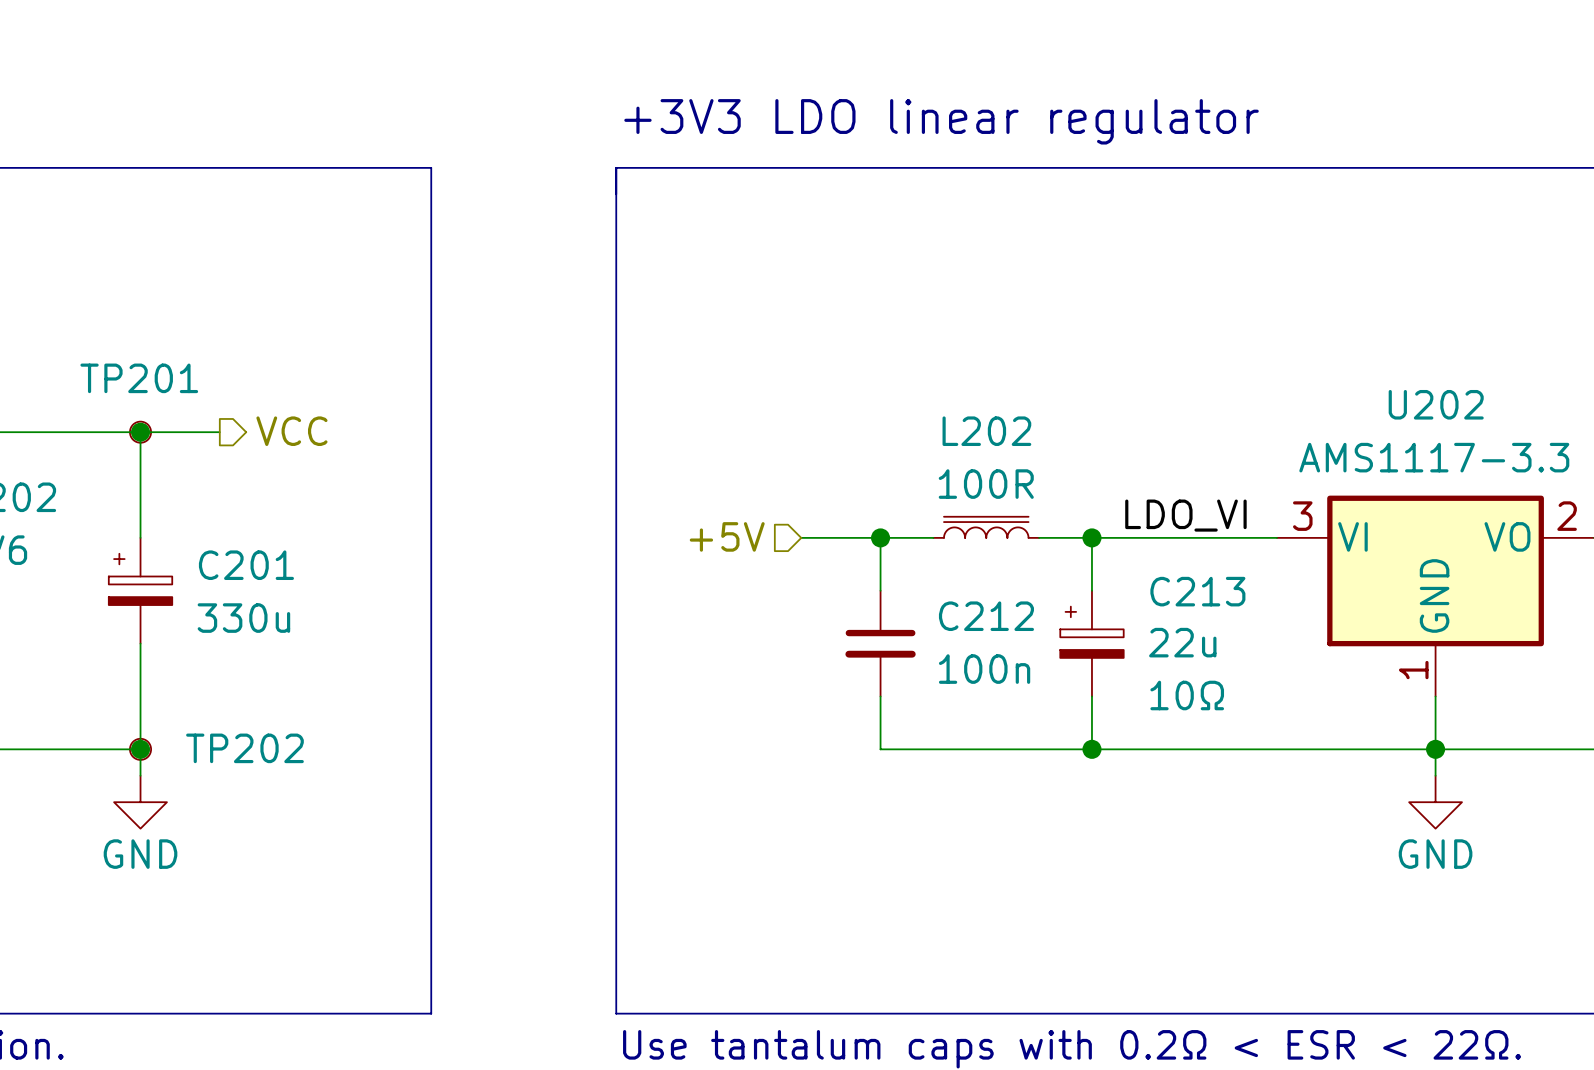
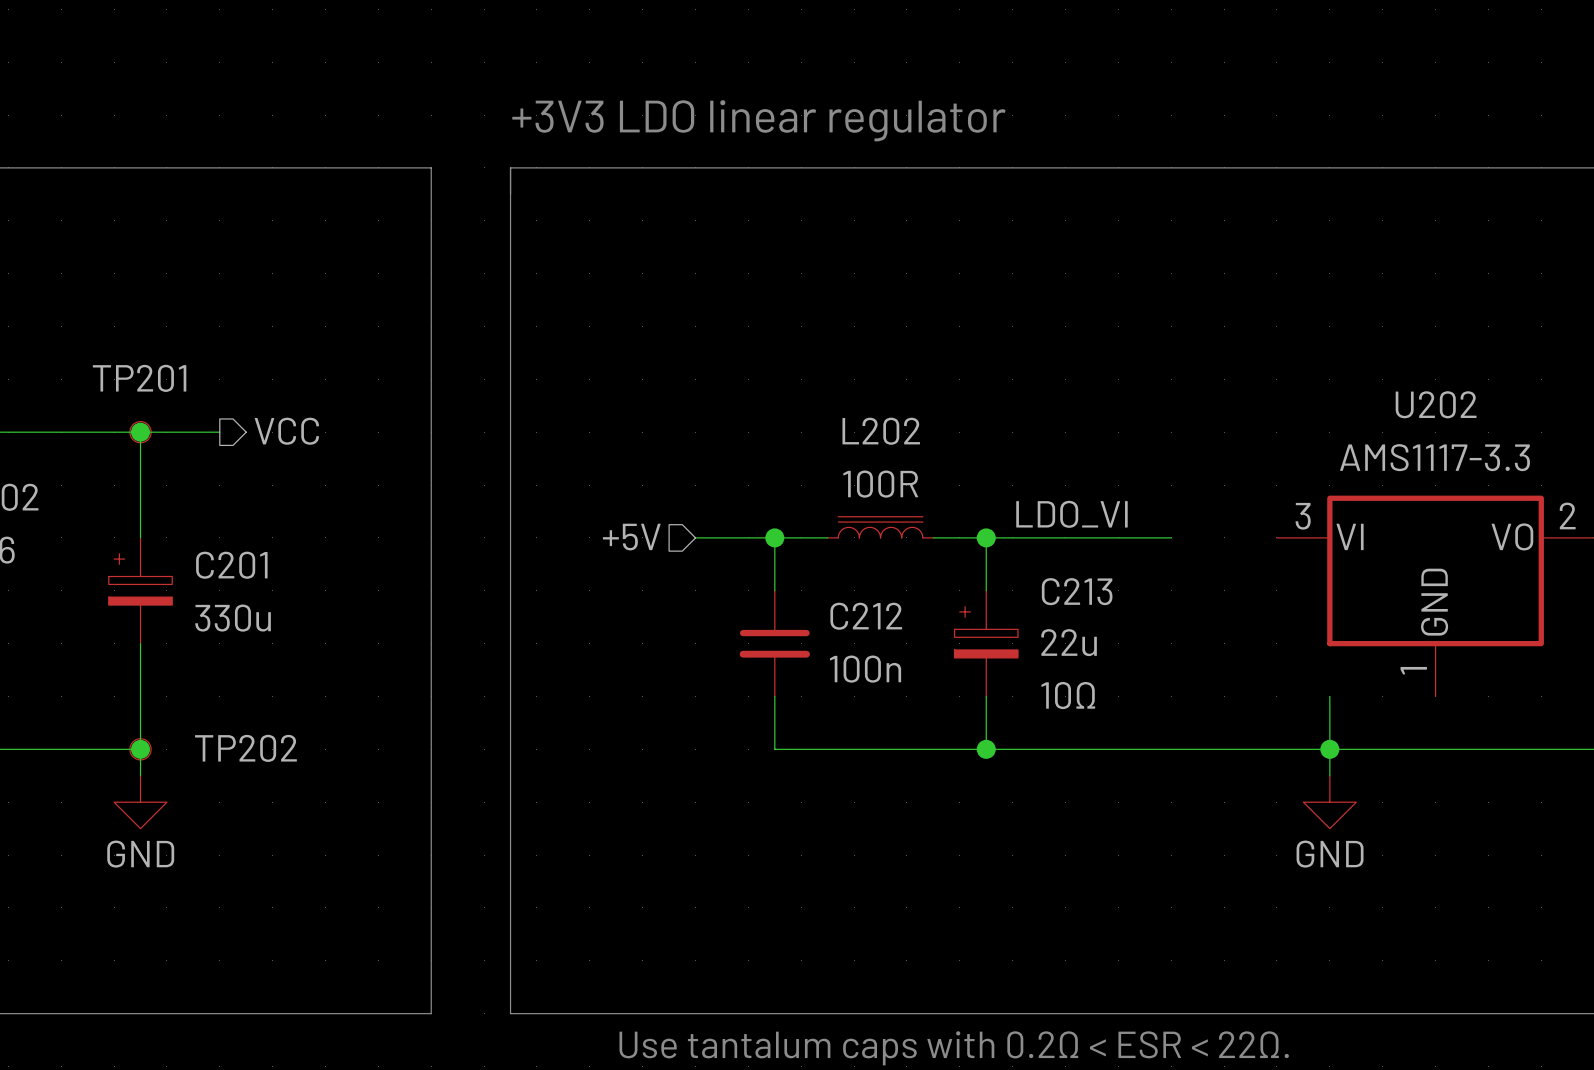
text position: +3V3 LDO linear regulator (941, 121) -> +3V3 LDO linear regulator (758, 120)
line: (616, 167) (616, 1013) -> (616, 167) (510, 167) (510, 1013) (616, 1013)
label position: LDO_VI (1185, 515) -> LDO_VI (1071, 514)
L202 position: (986, 527) -> (880, 527)
hierarchical label position: +5V (727, 536) -> +5V (631, 537)
junction: none -> (774, 537)
wire: (827, 537) (933, 537) -> (1039, 537) (933, 537)
wire: (880, 537) (880, 590) -> (774, 537) (774, 590)
junction: (880, 537) -> none
junction: none -> (986, 537)
wire: (1091, 537) (1091, 590) -> (986, 537) (986, 590)
junction: (1091, 537) -> none
wire: (1171, 537) (1276, 537) -> (695, 537) (801, 537)
C212 position: (880, 643) -> (774, 643)
C213 position: (1091, 643) -> (986, 643)
wire: (880, 696) (880, 749) -> (774, 696) (774, 749) (880, 749)
wire: (1091, 696) (1091, 749) -> (986, 696) (986, 749)
wire: (1435, 696) (1435, 775) -> (1329, 696) (1329, 775)
junction position: (1091, 749) -> (986, 749)
junction position: (1435, 749) -> (1329, 749)
power symbol position: GND (1435, 802) -> GND (1329, 802)

